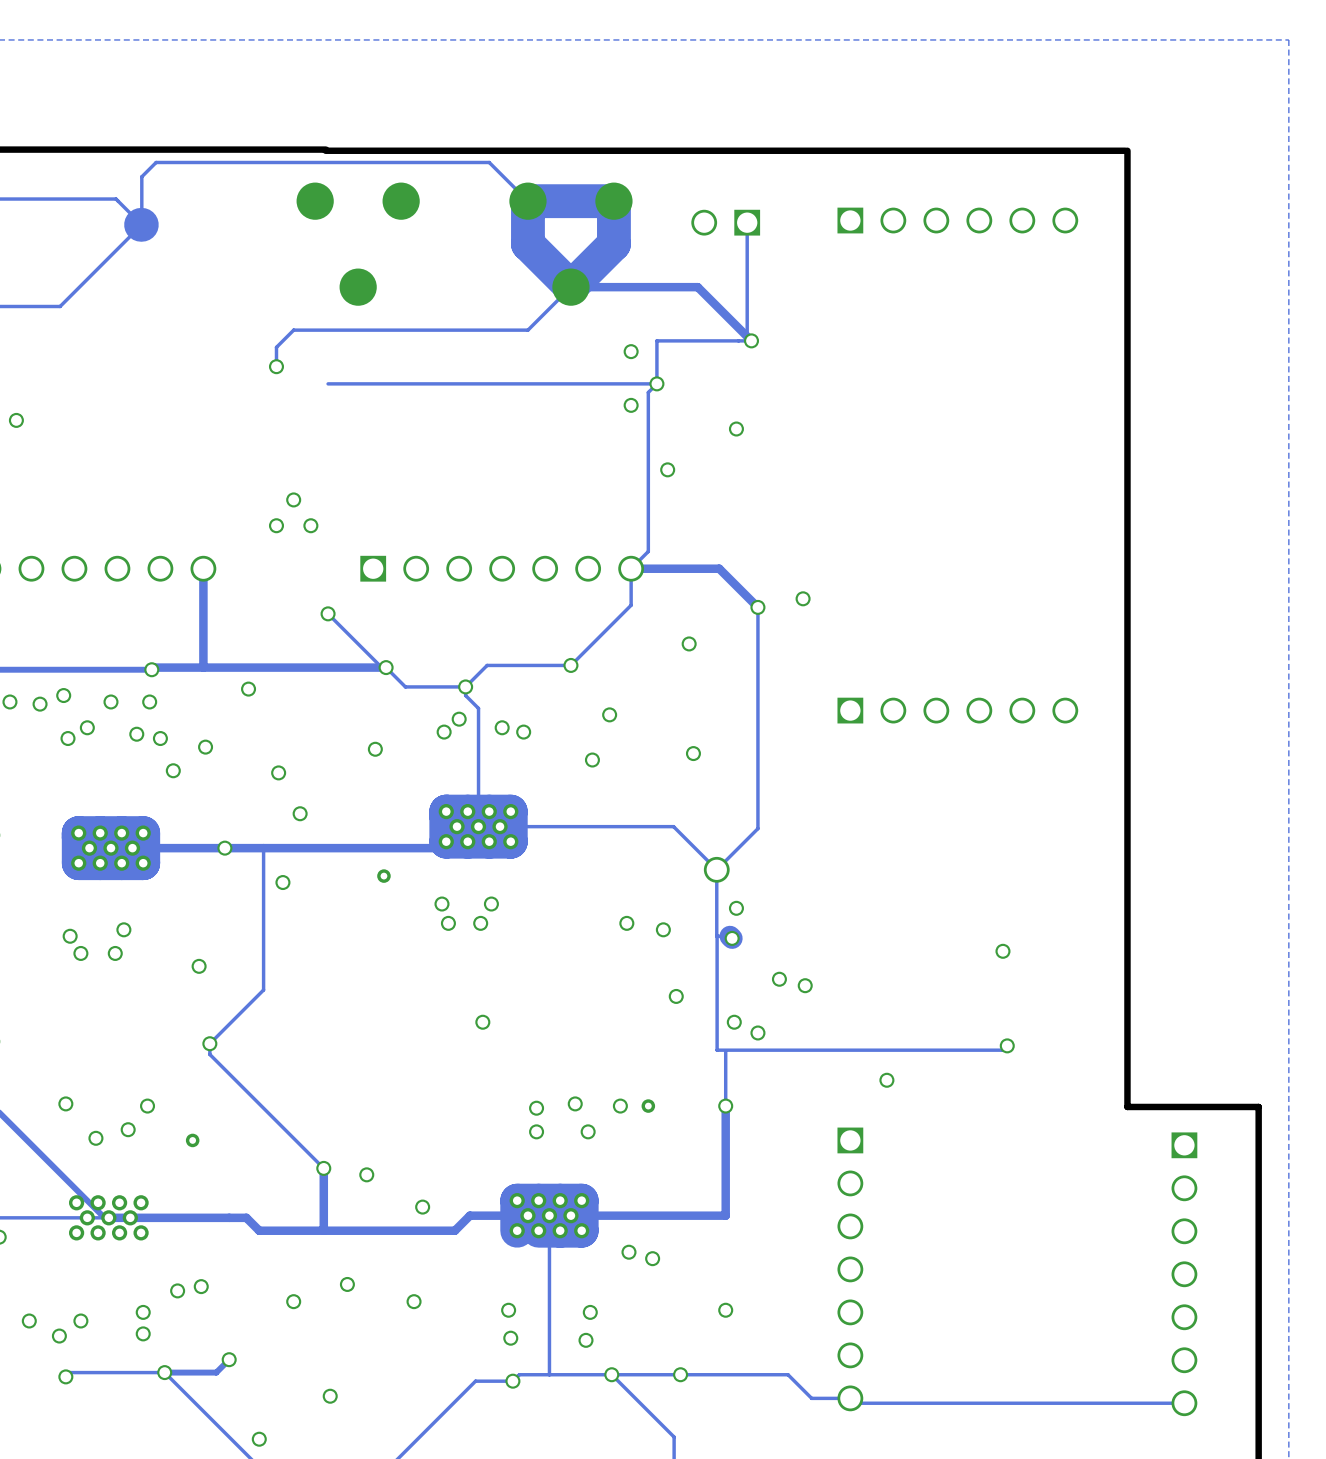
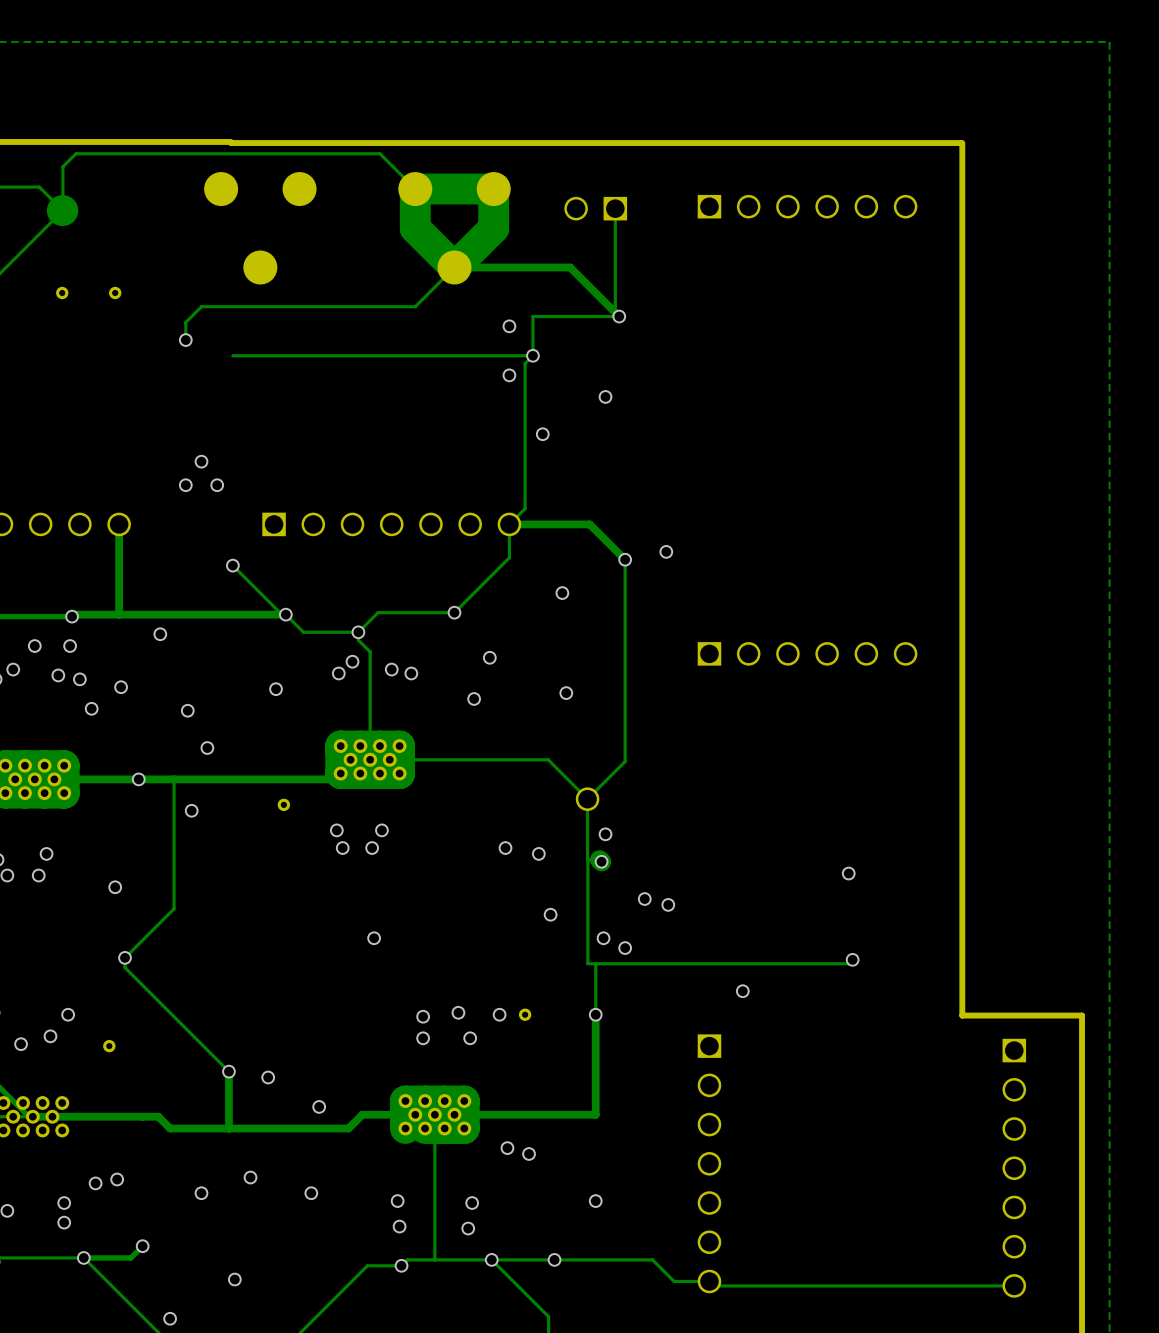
part: none -> (62, 292)
part: none -> (115, 292)

